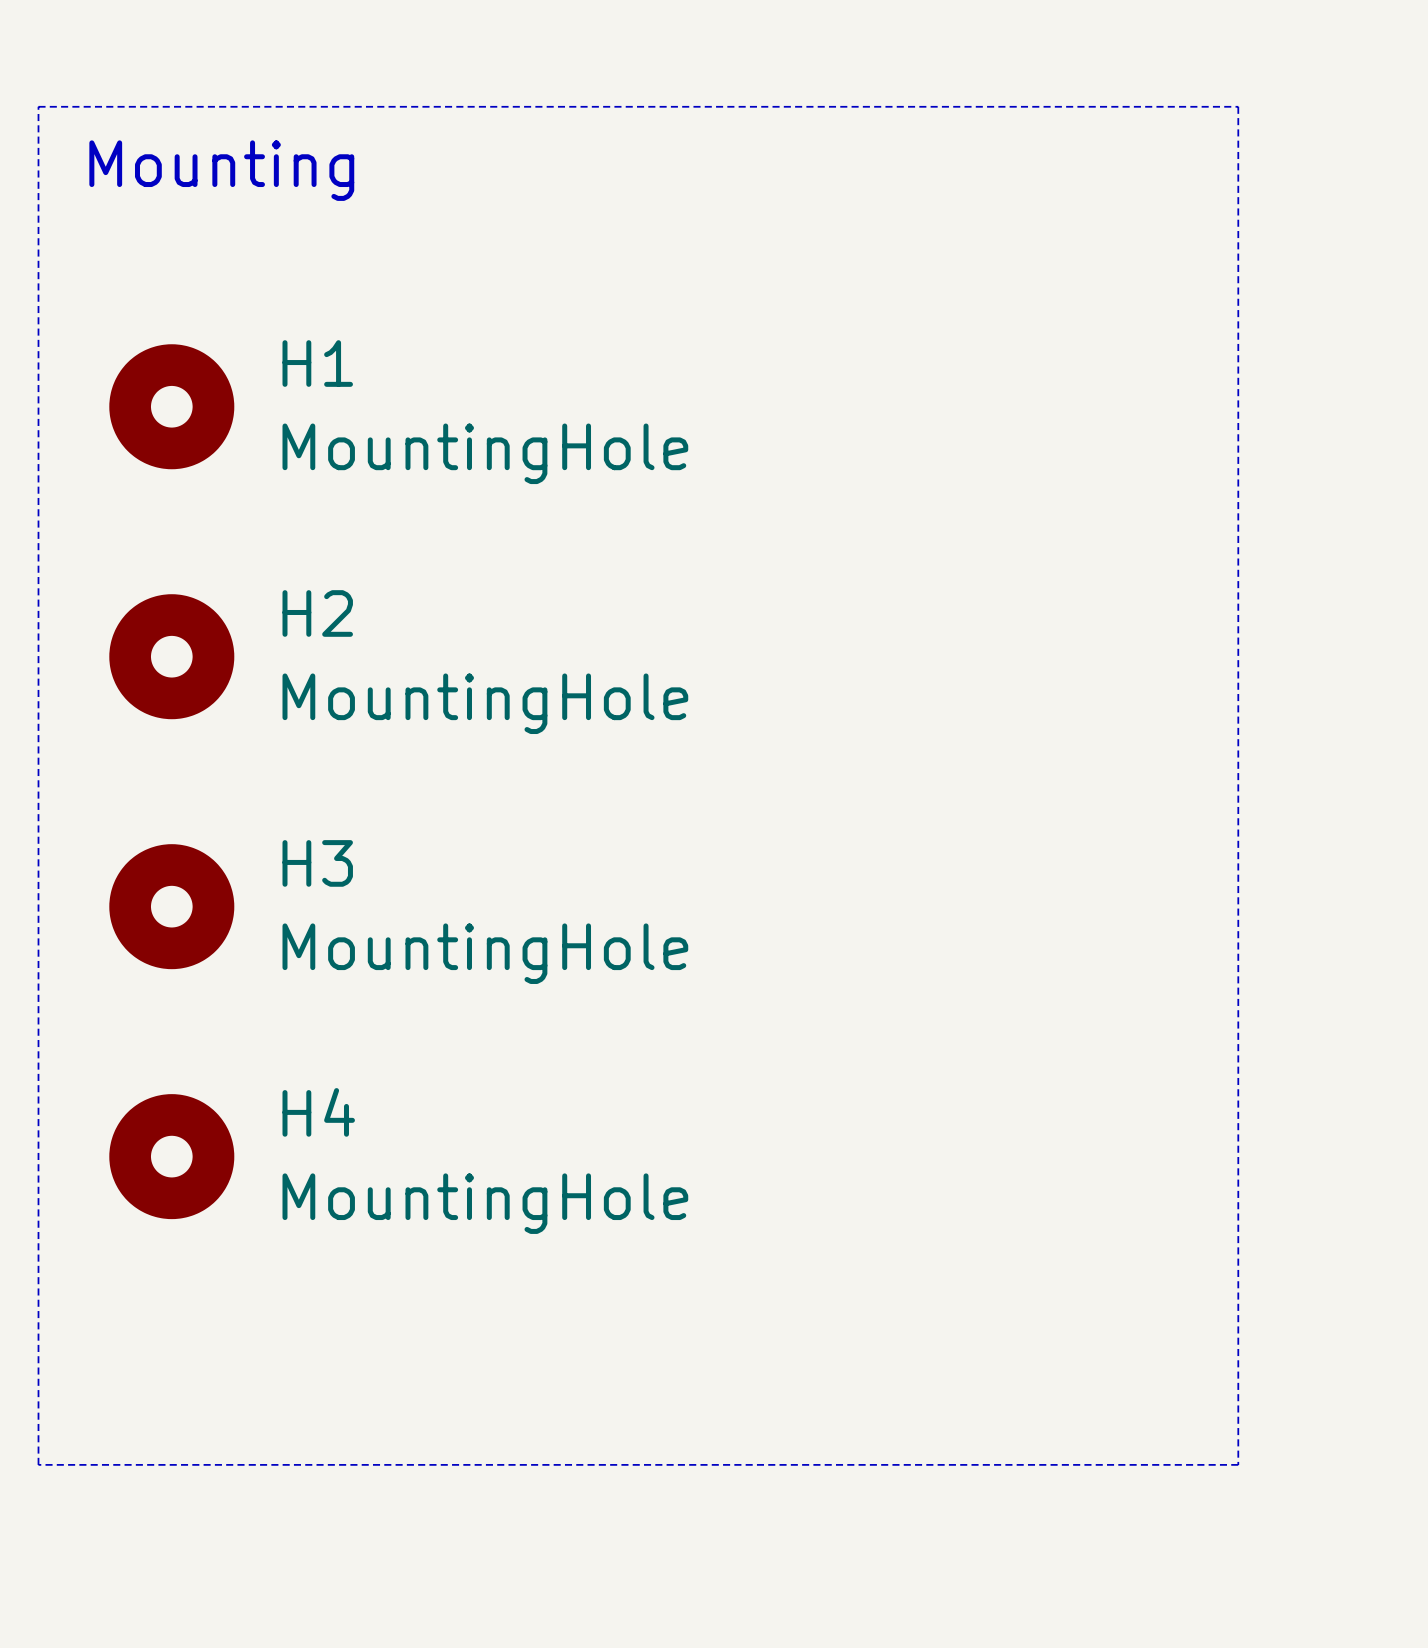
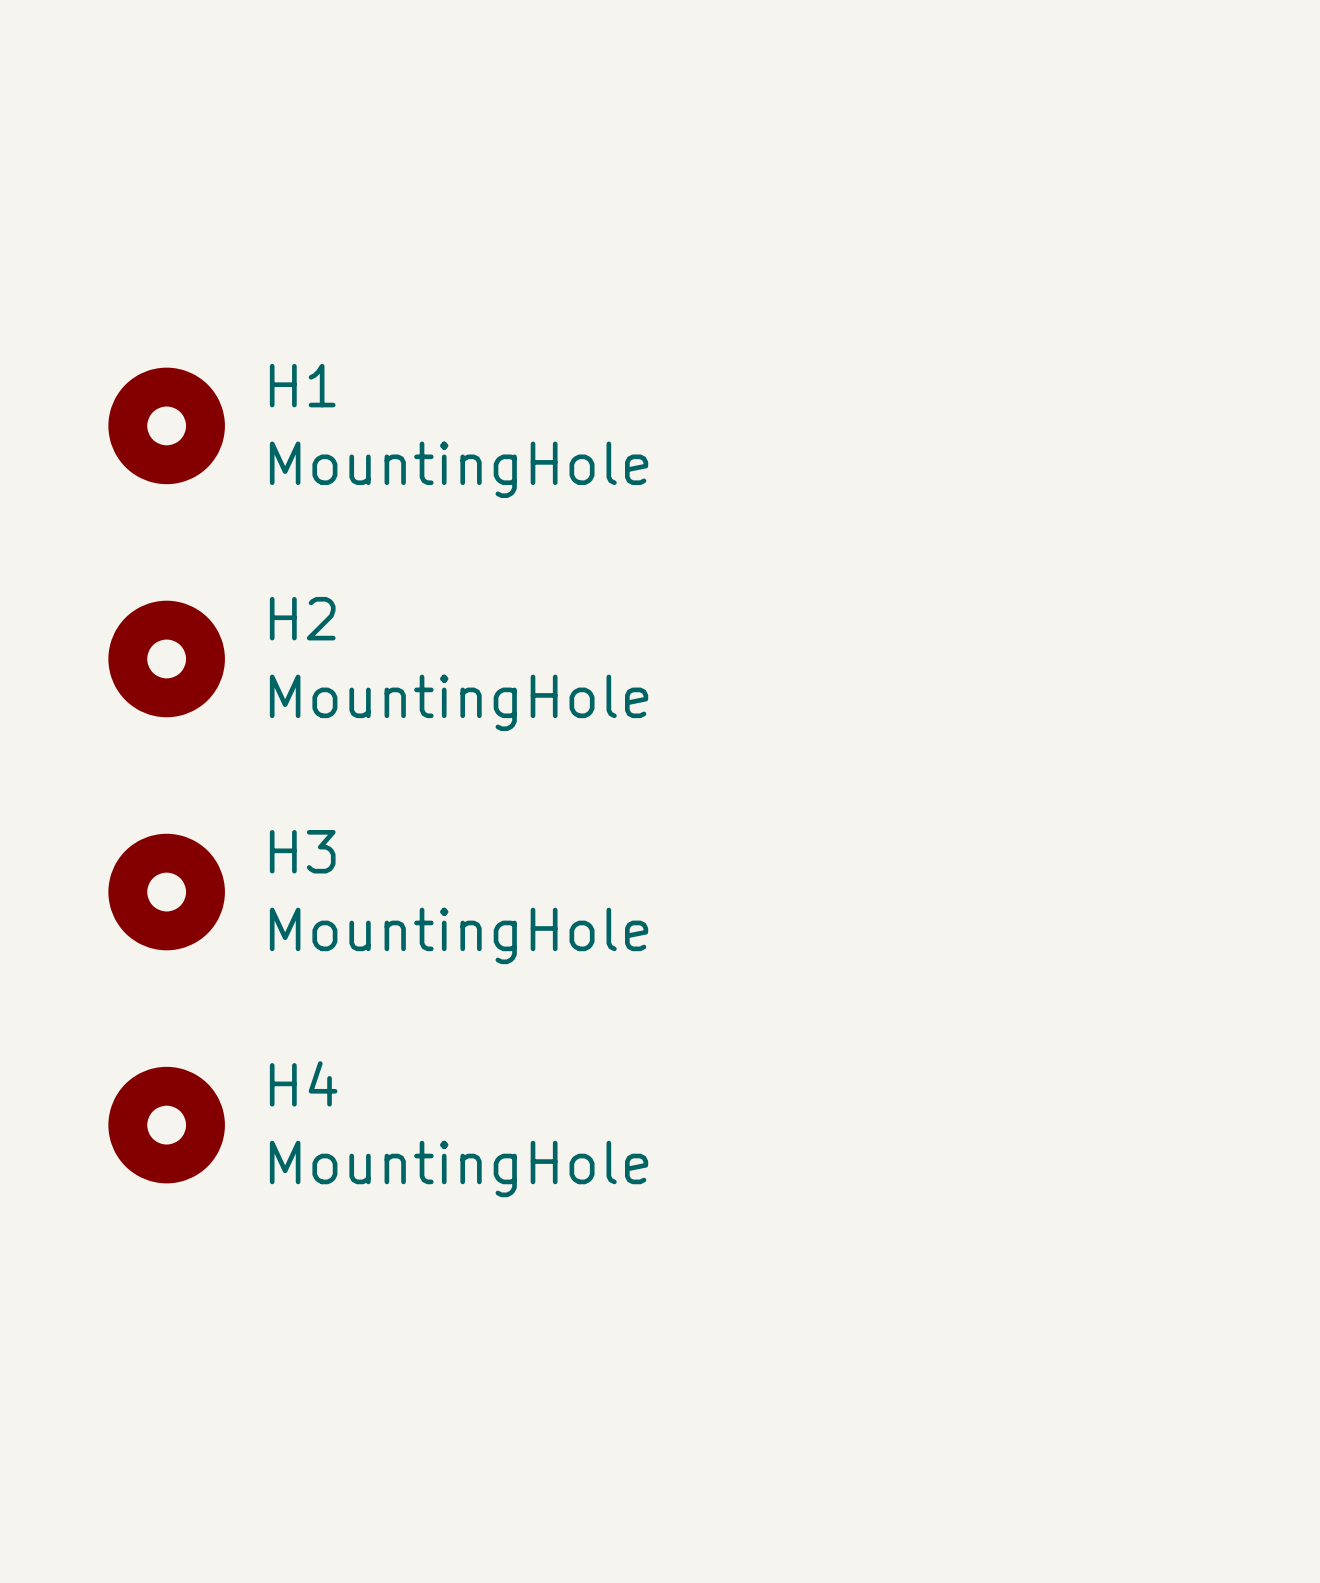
line: (38, 106) (1238, 106) (1238, 1464) (38, 1464) (38, 106) -> none
text: Mounting (221, 170) -> none

